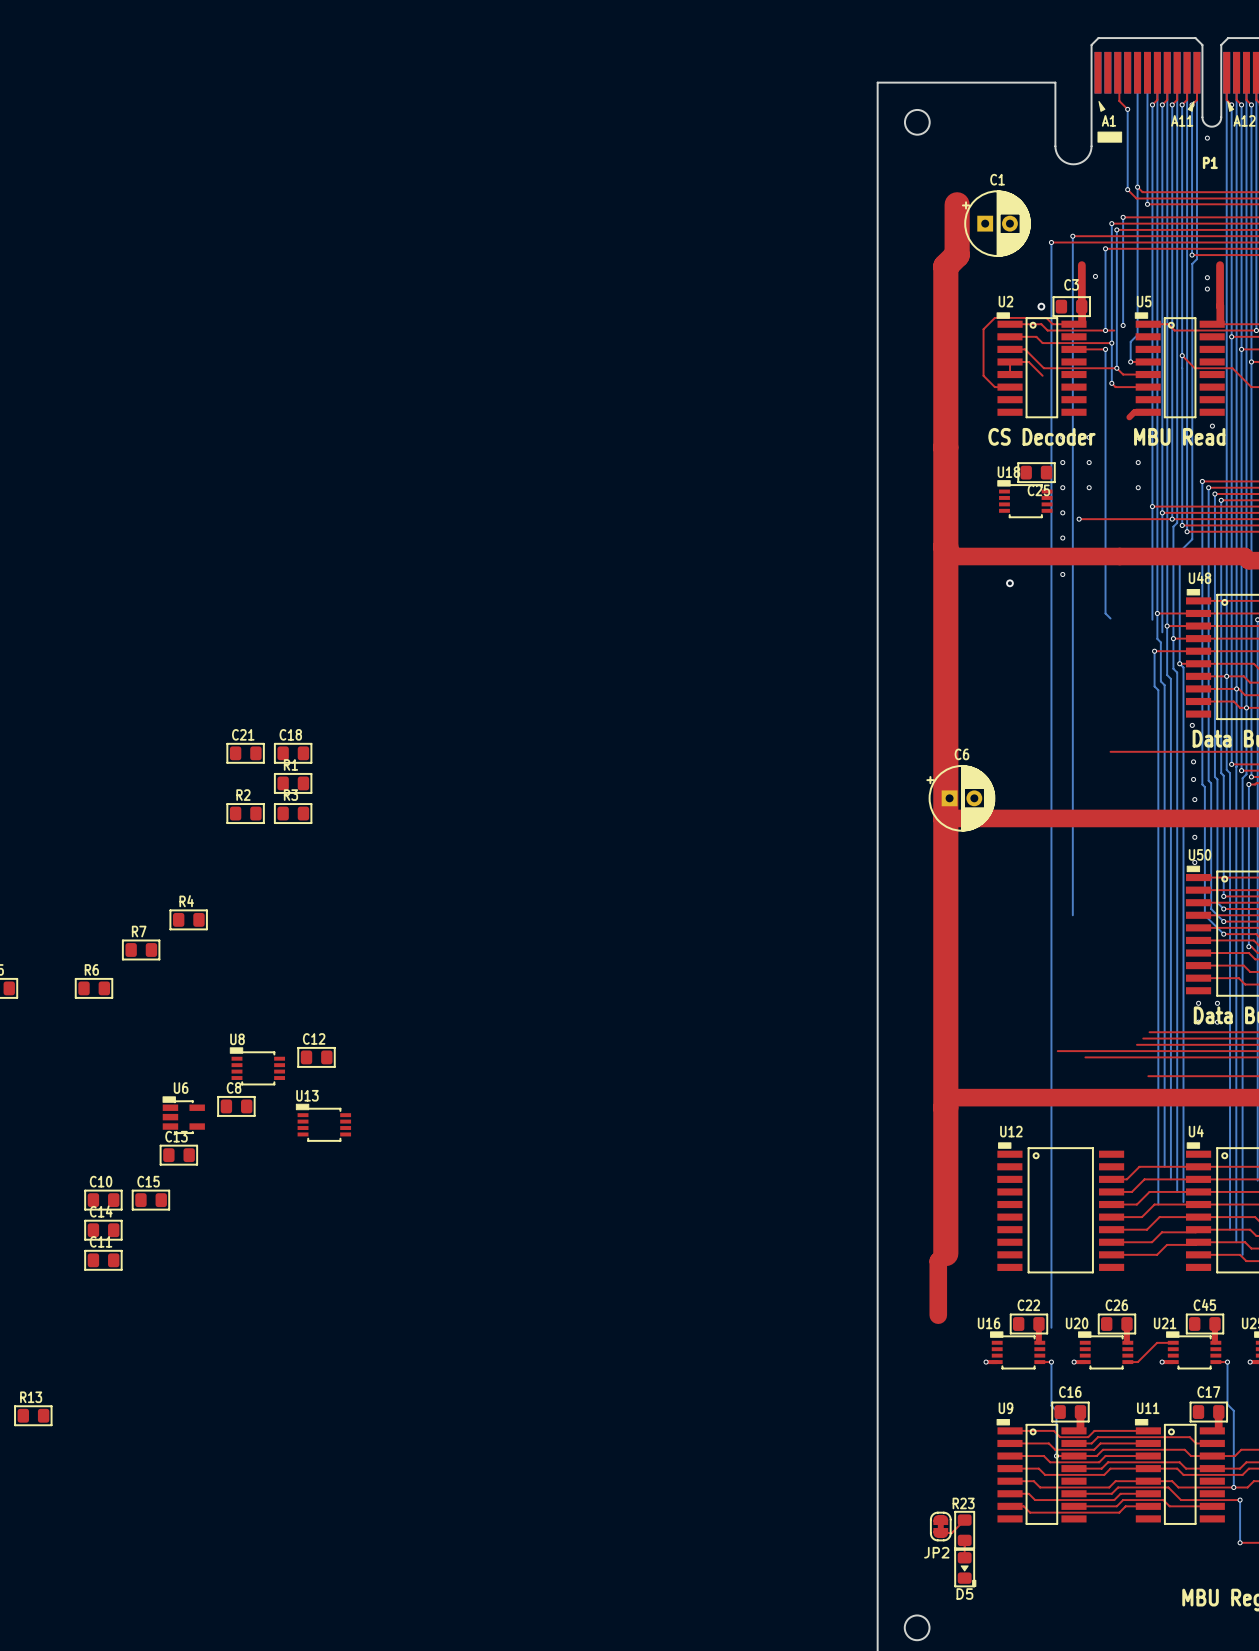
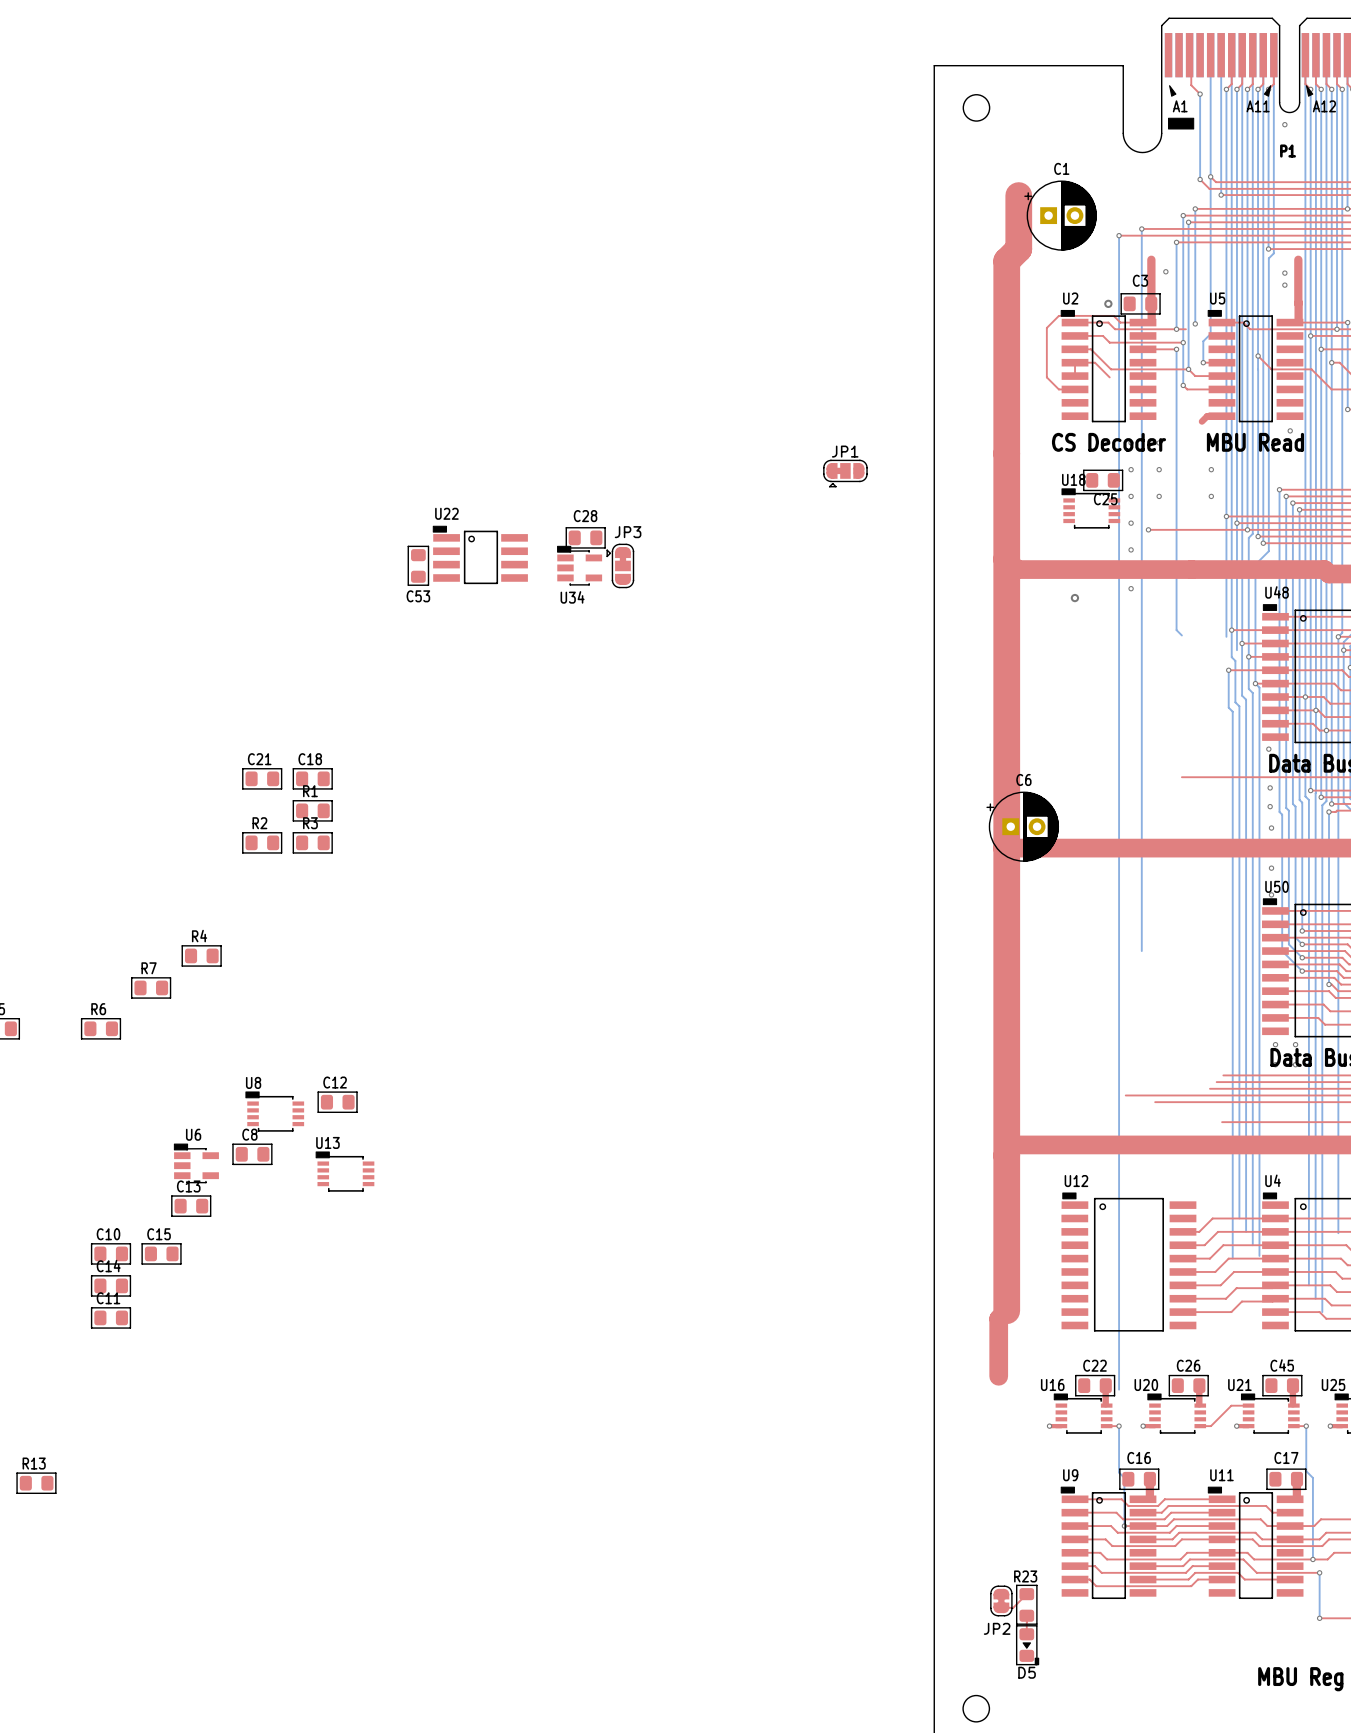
JP1: none -> (845, 473)
C28: none -> (585, 537)
U22: none -> (480, 554)
C53: none -> (418, 565)
U34: none -> (579, 565)
JP3: none -> (620, 565)

